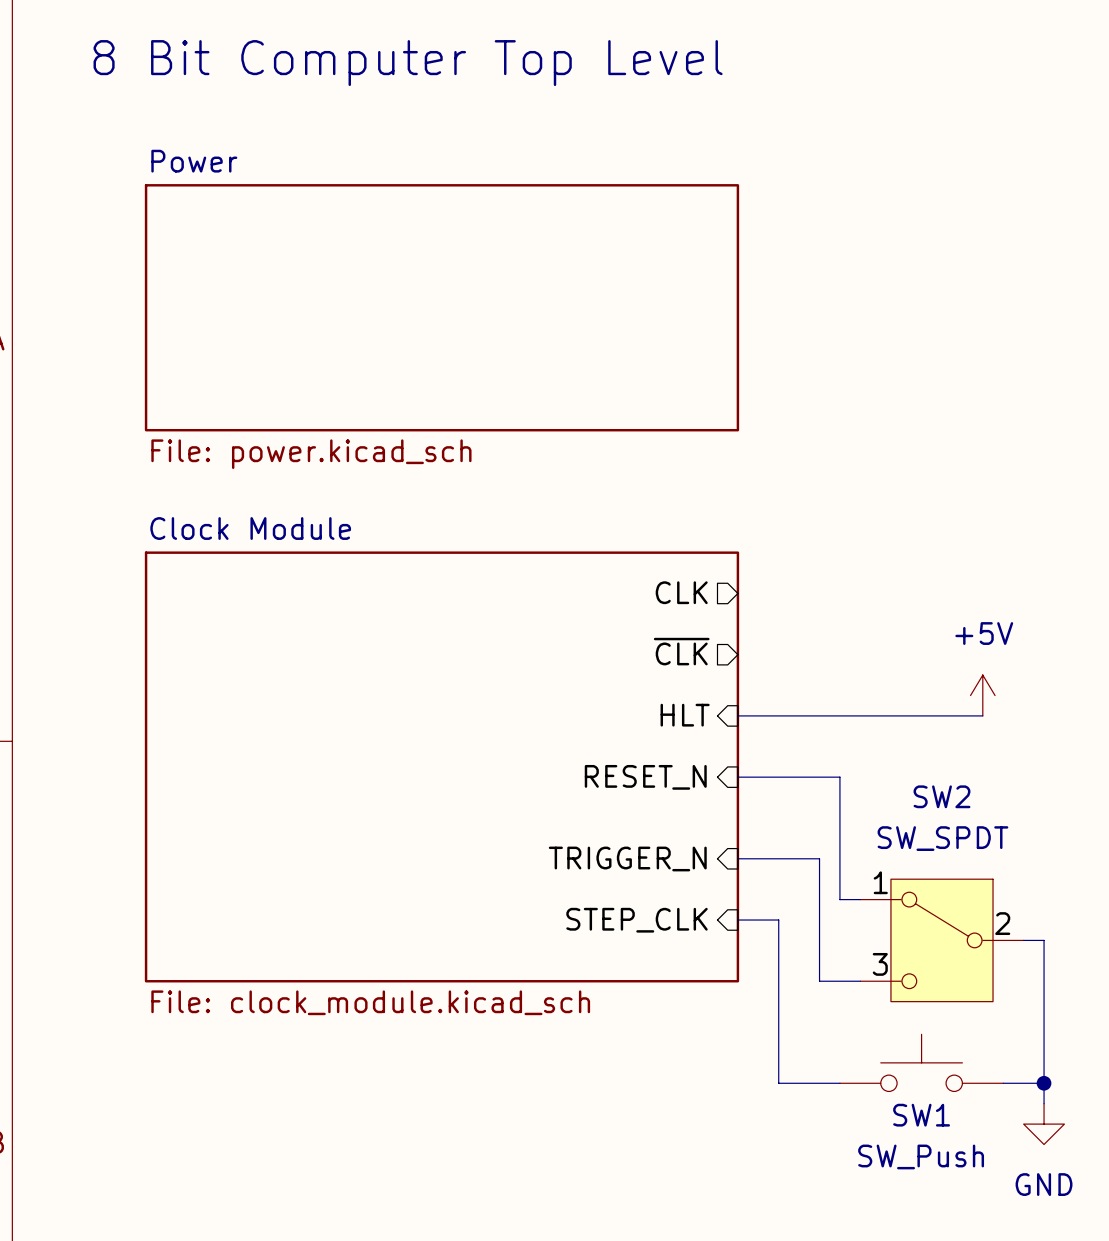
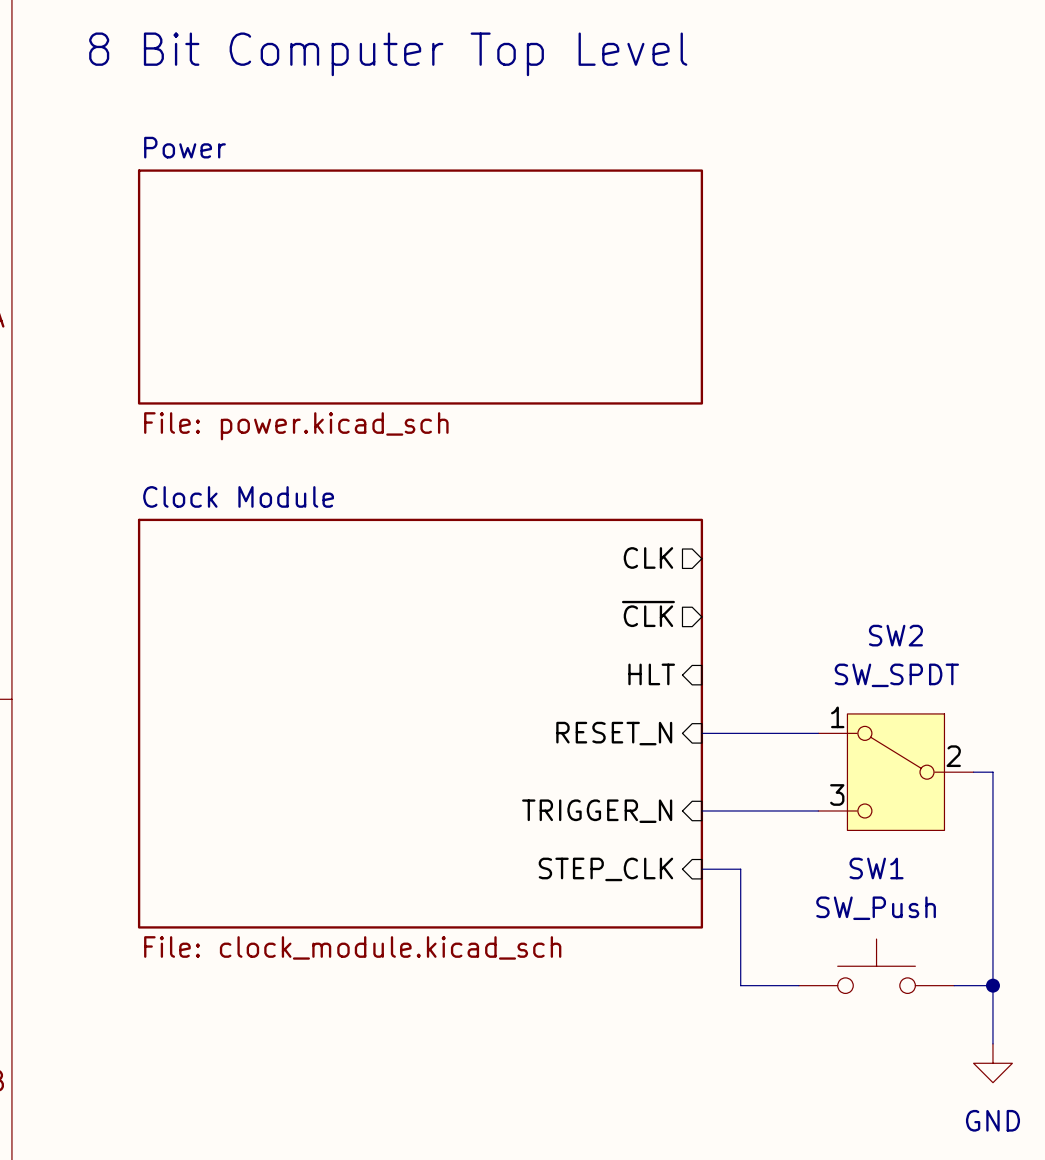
power symbol: +5V (982, 695) -> none
wire: (737, 715) (982, 715) -> none
wire: (839, 777) (839, 899) (860, 899) -> (798, 733) (818, 733)
wire: (819, 858) (819, 981) (860, 981) -> (779, 810) (818, 810)
SW2 position: (941, 940) -> (895, 772)
wire: (1023, 940) (1044, 940) -> (973, 772) (992, 772) (992, 888)
wire: (778, 1042) (778, 1083) (839, 1083) -> (740, 985) (798, 985)
SW1 position: (921, 1062) -> (876, 966)
wire: (1003, 1083) (1044, 1083) -> (954, 985) (992, 985)
junction position: (1044, 1083) -> (992, 985)
SW1 name position: SW1 (921, 1115) -> SW1 (876, 868)
SW1 value position: SW_Push (921, 1156) -> SW_Push (876, 908)

